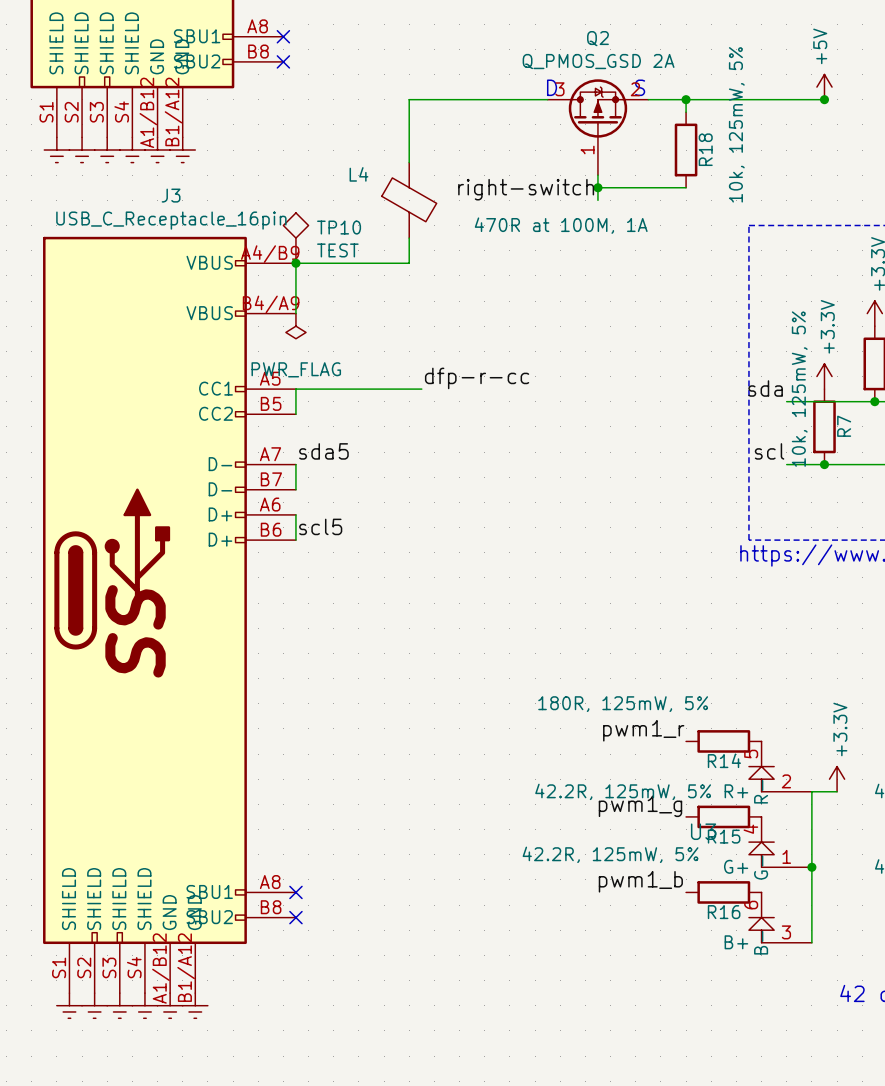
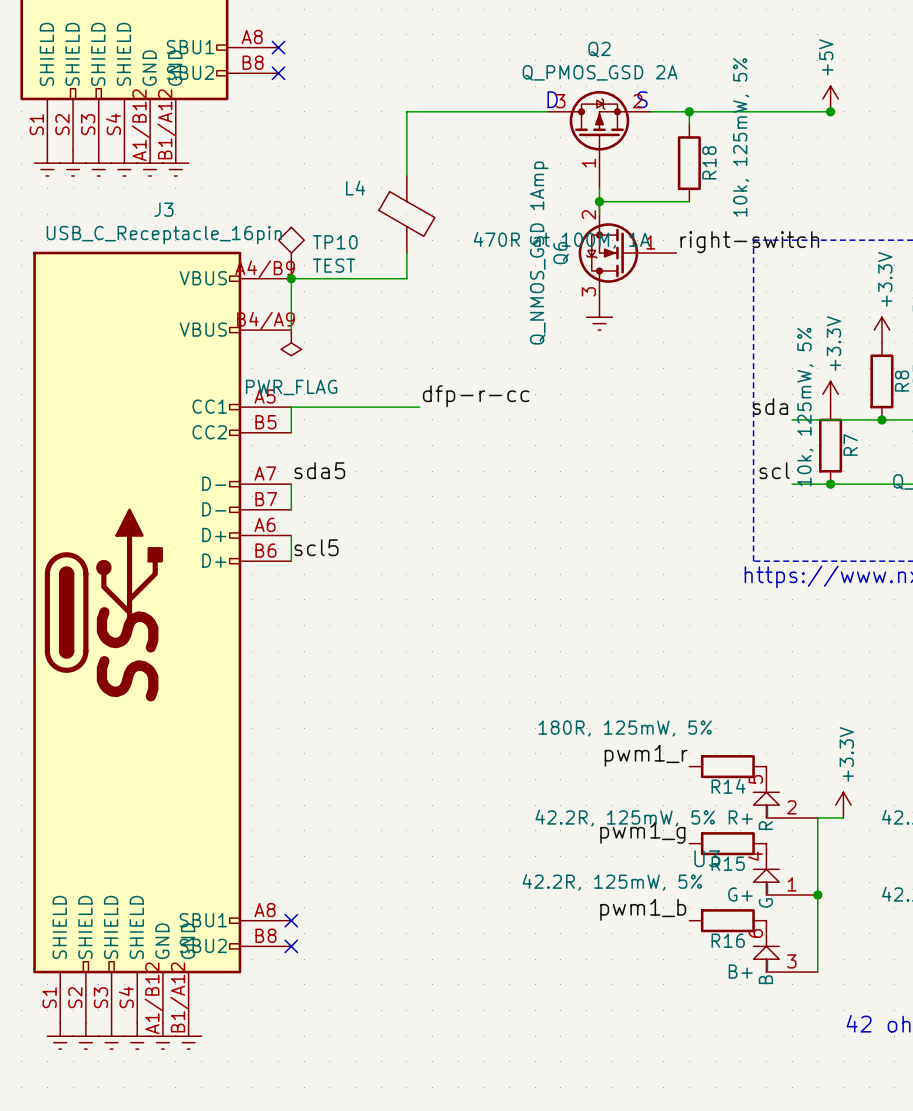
label position: right-switch (526, 189) -> right-switch (749, 242)
Q6: none -> Q_NMOS_GSD 1Amp (627, 253)
power symbol: none -> (599, 317)

